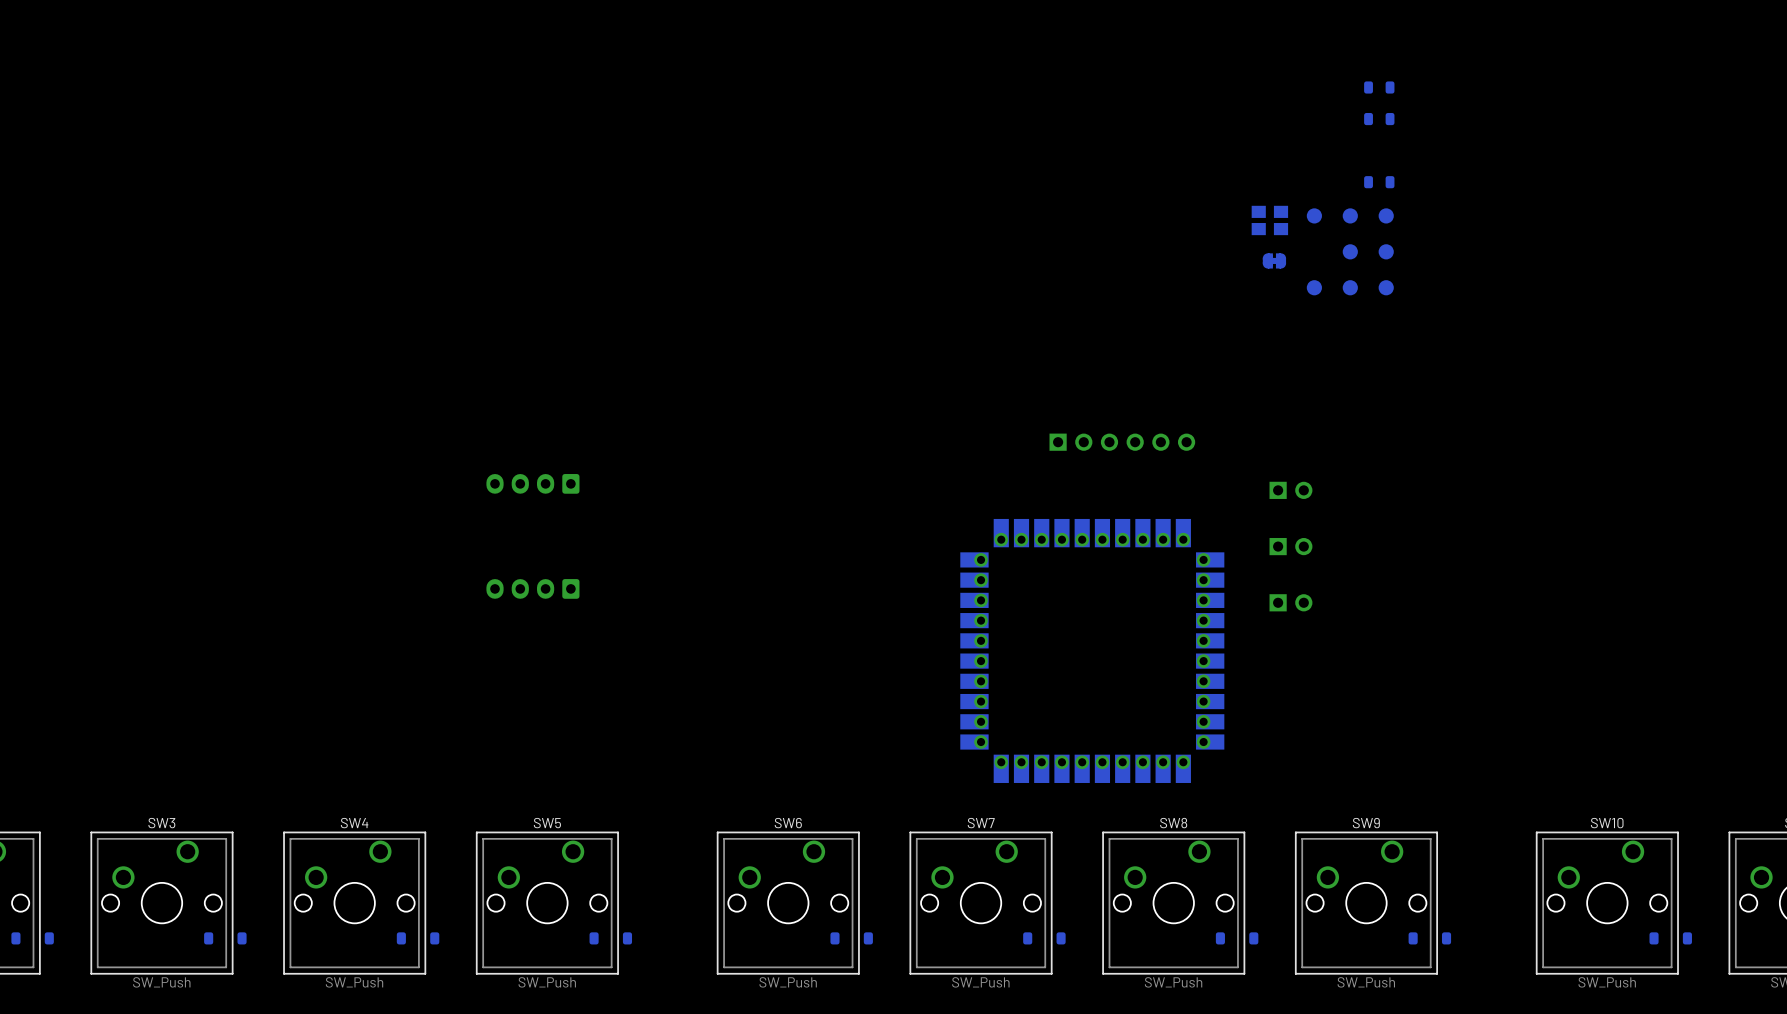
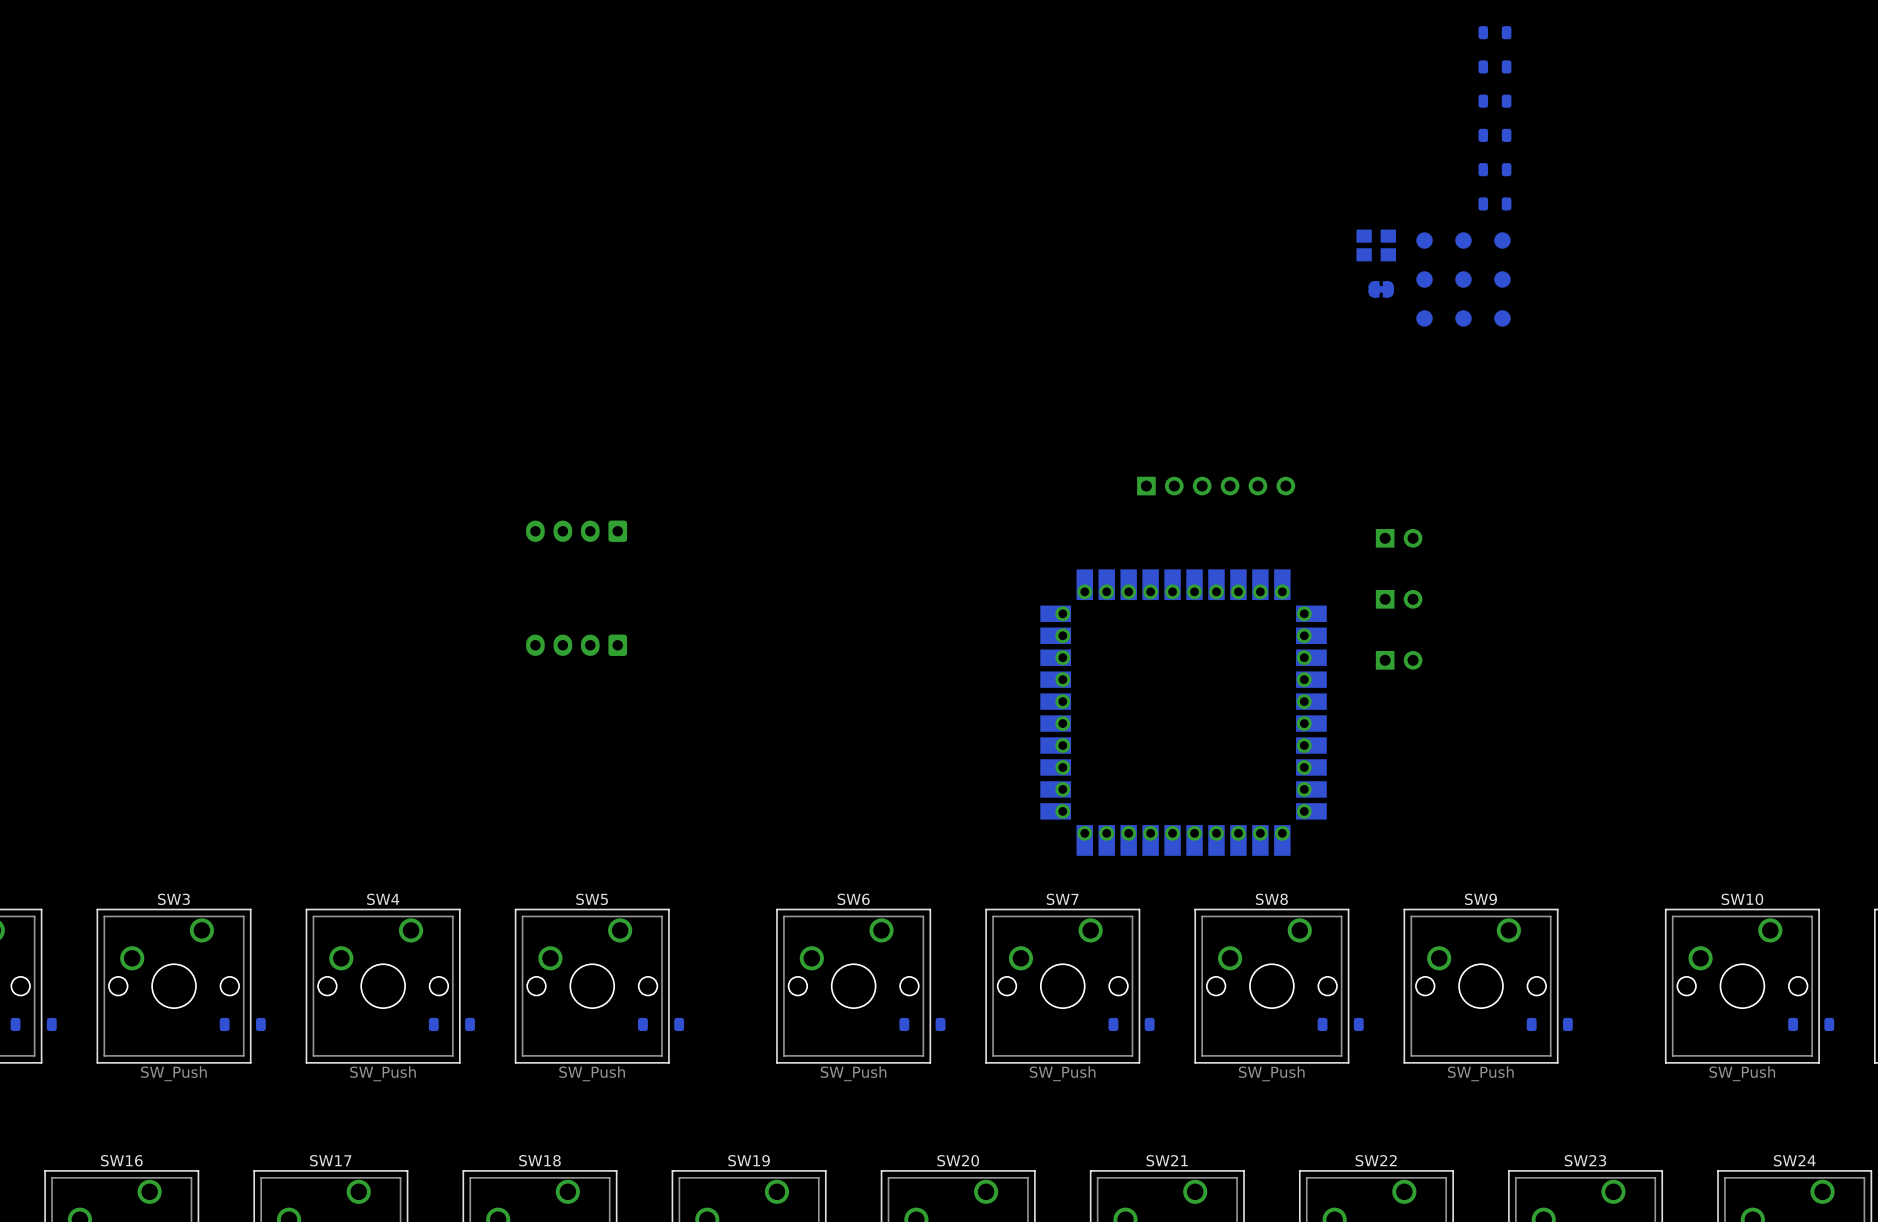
part: none -> (1494, 32)
part: none -> (1494, 66)
part: none -> (1494, 169)
part: none -> (1424, 279)

